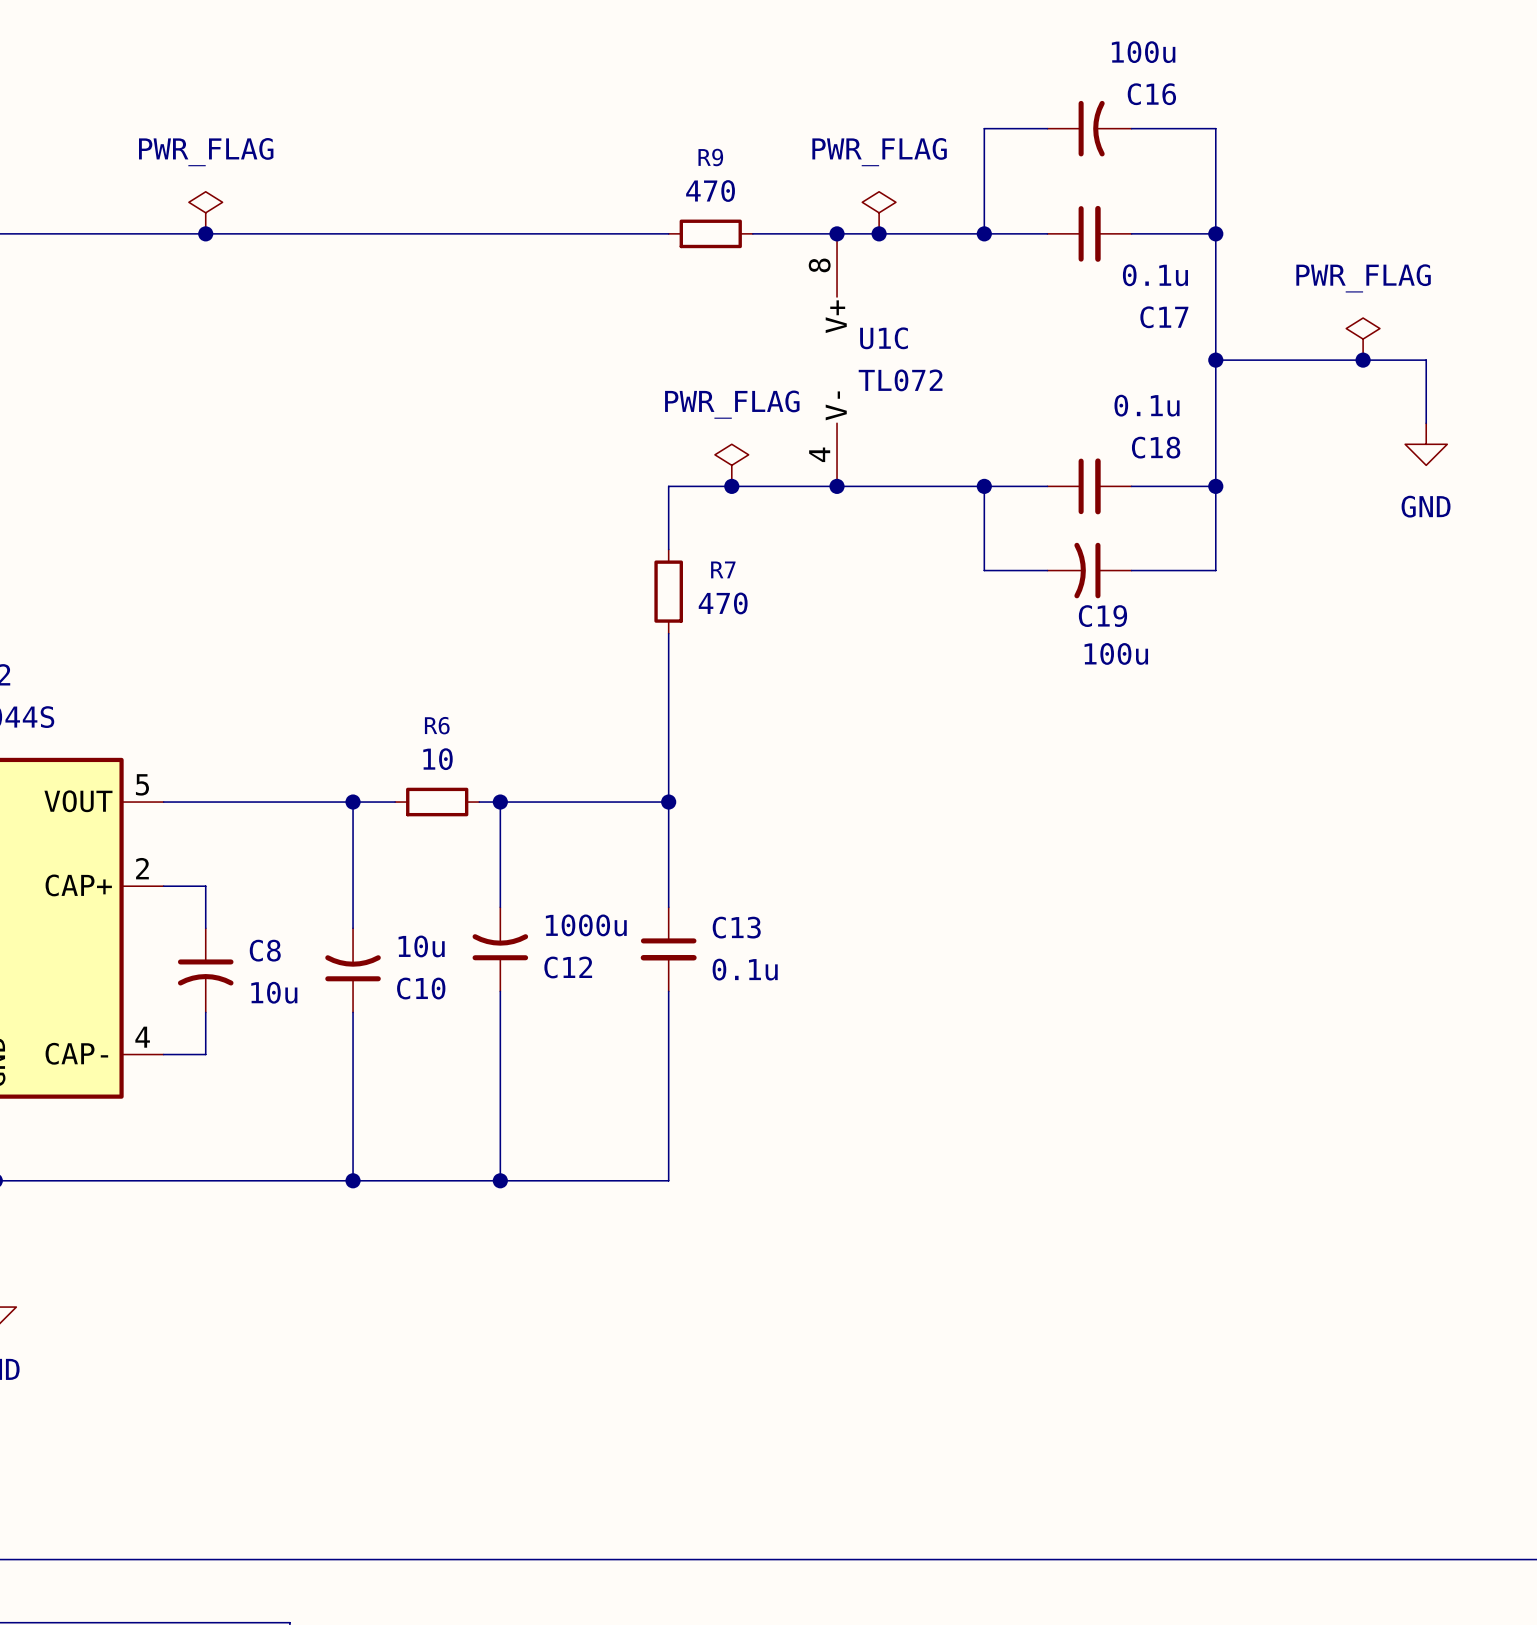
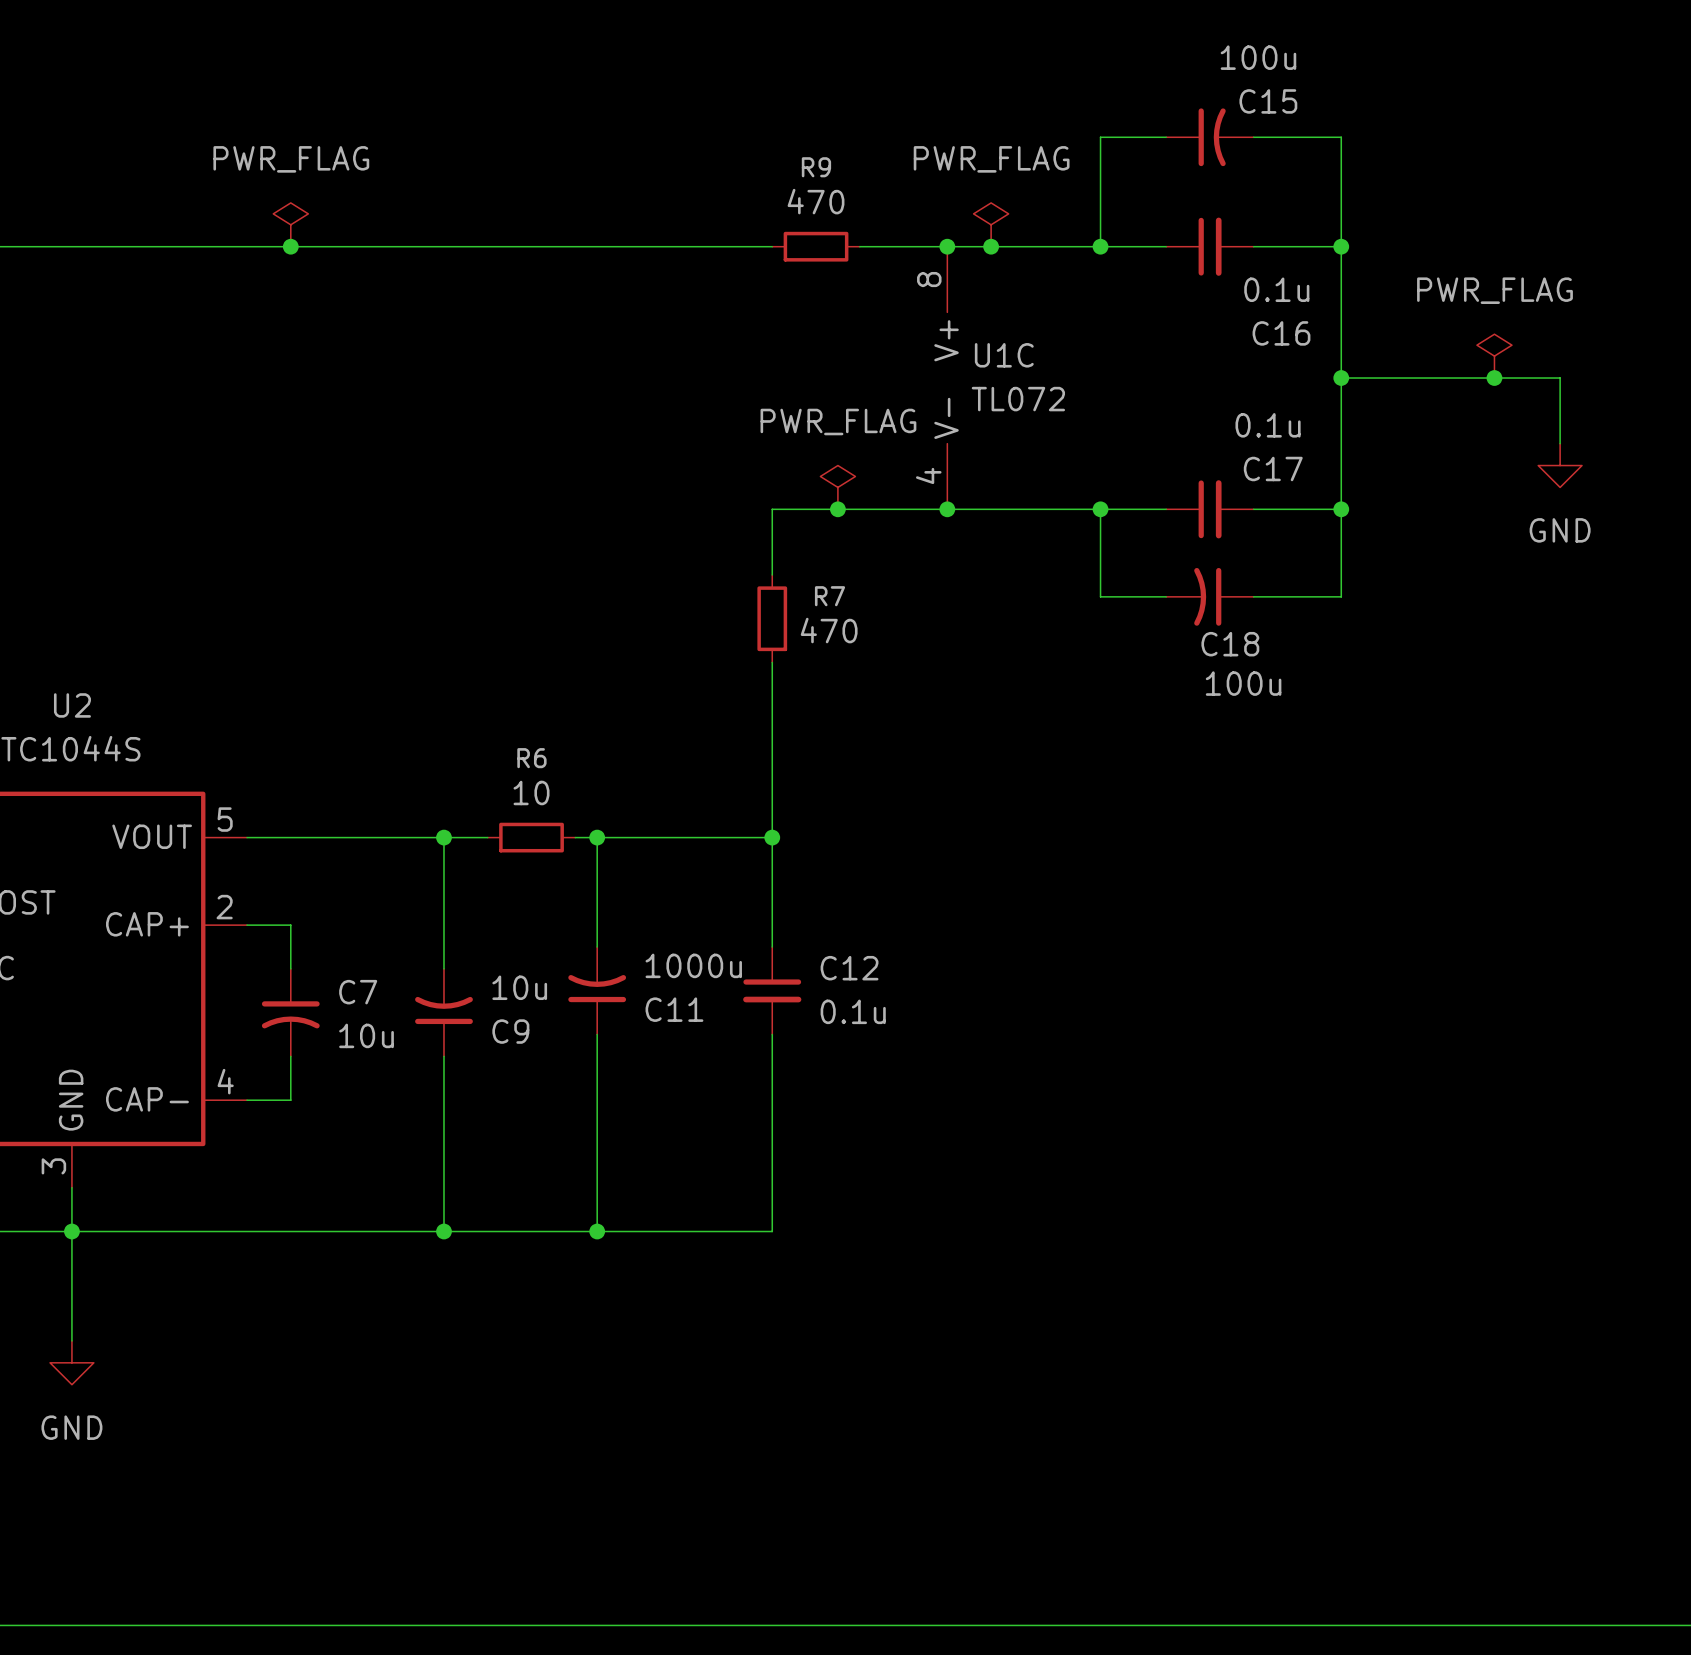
C16 name: C16 (1151, 94) -> C15 (1268, 101)
C17 name: C17 (1164, 317) -> C16 (1281, 333)
C18 name: C18 (1156, 447) -> C17 (1273, 469)
C19 name: C19 (1102, 616) -> C18 (1230, 644)
C13 name: C13 (736, 927) -> C12 (849, 968)
C8 name: C8 (265, 950) -> C7 (358, 992)
C12 name: C12 (568, 967) -> C11 (674, 1009)
C10 name: C10 (421, 988) -> C9 (510, 1031)

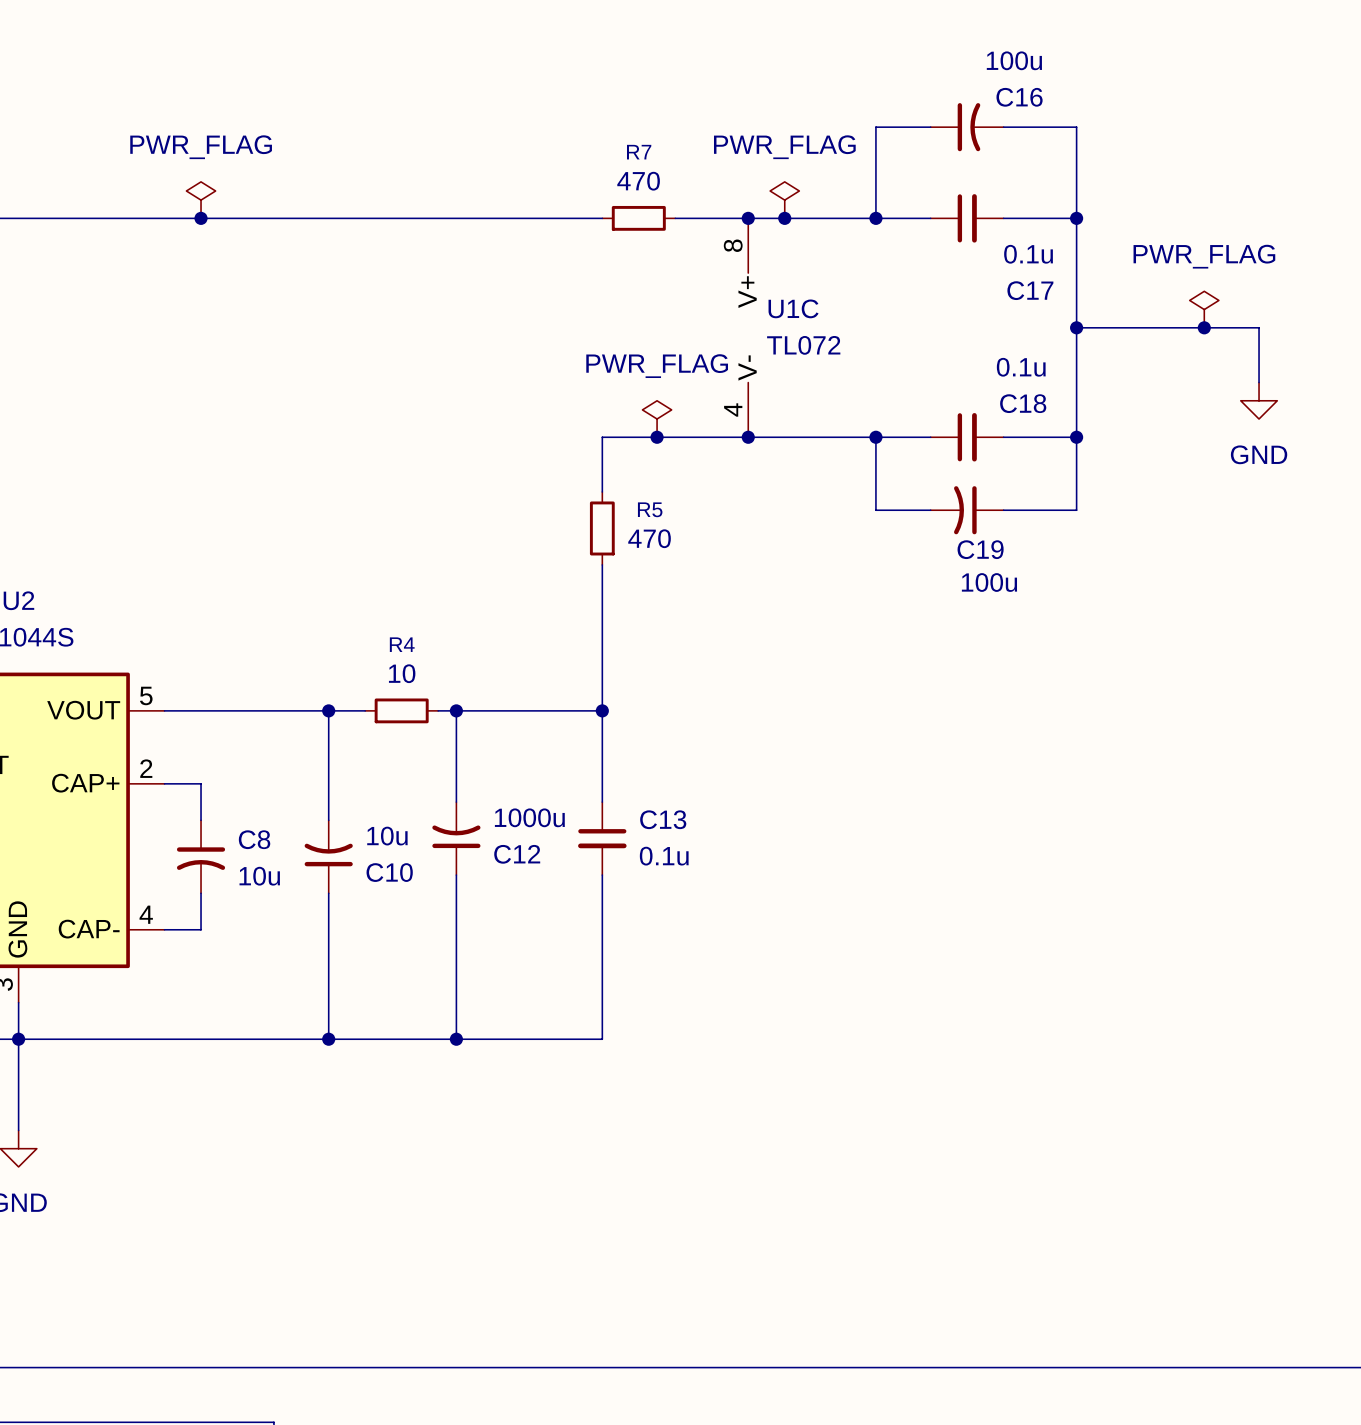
C15 name: C15 (1268, 101) -> C16 (1019, 97)
R9 name: R9 (816, 167) -> R7 (639, 152)
C16 name: C16 (1281, 333) -> C17 (1030, 290)
C17 name: C17 (1273, 469) -> C18 (1023, 403)
R7 name: R7 (829, 596) -> R5 (650, 509)
C18 name: C18 (1230, 644) -> C19 (980, 549)
R6 name: R6 (531, 758) -> R4 (402, 644)
C12 name: C12 (849, 968) -> C13 (663, 819)
C7 name: C7 (358, 992) -> C8 (254, 839)
C11 name: C11 (674, 1009) -> C12 (517, 854)
C9 name: C9 (510, 1031) -> C10 (389, 872)

